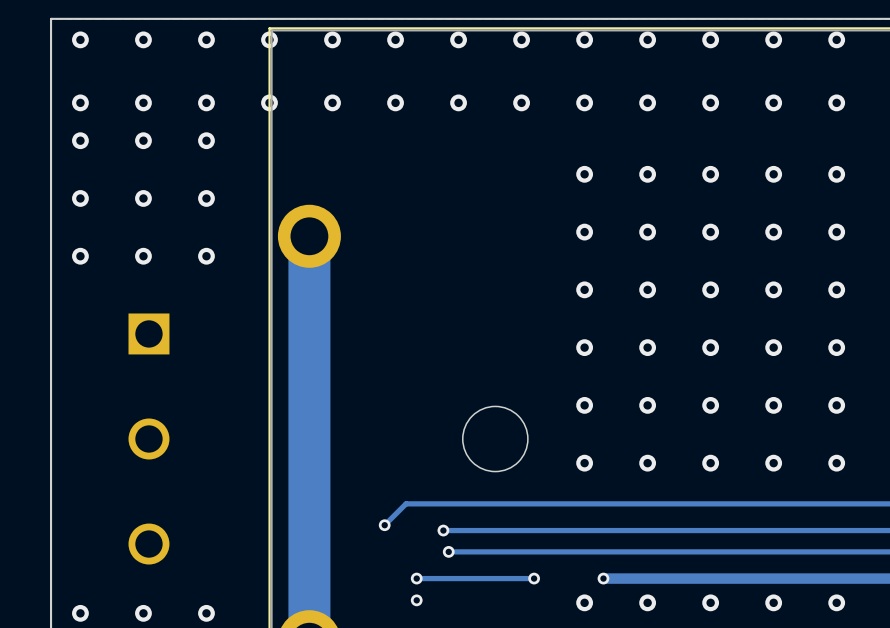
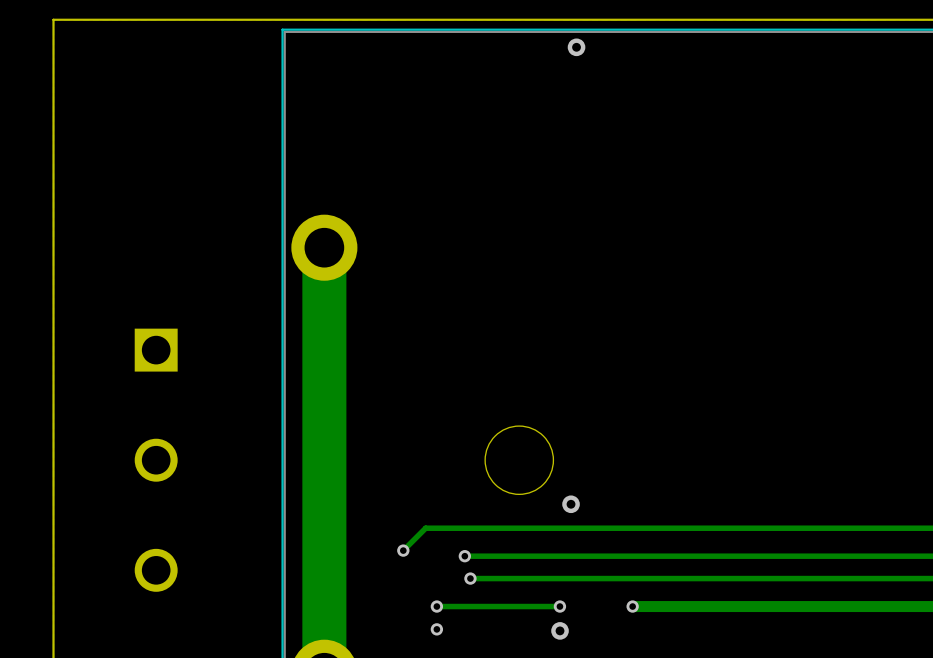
via: (80, 39) -> none
via: (143, 39) -> none
via: (206, 39) -> none
via: (269, 39) -> none
via: (332, 39) -> none
via: (395, 39) -> none
via: (458, 39) -> none
via: (521, 39) -> none
via: (584, 39) -> none
via: (647, 39) -> none
via: (710, 39) -> none
via: (773, 39) -> none
via: (836, 39) -> none
via: none -> (576, 47)
via: (80, 102) -> none
via: (143, 102) -> none
via: (206, 102) -> none
via: (269, 102) -> none
via: (332, 102) -> none
via: (395, 102) -> none
via: (458, 102) -> none
via: (521, 102) -> none
via: (584, 102) -> none
via: (647, 102) -> none
via: (710, 102) -> none
via: (773, 102) -> none
via: (836, 102) -> none
via: (80, 140) -> none
via: (143, 140) -> none
via: (206, 140) -> none
via: (584, 174) -> none
via: (647, 174) -> none
via: (710, 174) -> none
via: (773, 174) -> none
via: (836, 174) -> none
via: (80, 198) -> none
via: (143, 198) -> none
via: (206, 198) -> none
via: (584, 232) -> none
via: (647, 232) -> none
via: (710, 232) -> none
via: (773, 232) -> none
via: (836, 232) -> none
via: (80, 256) -> none
via: (143, 256) -> none
via: (206, 256) -> none
via: (584, 289) -> none
via: (647, 289) -> none
via: (710, 289) -> none
via: (773, 289) -> none
via: (836, 289) -> none
via: (584, 347) -> none
via: (647, 347) -> none
via: (710, 347) -> none
via: (773, 347) -> none
via: (836, 347) -> none
via: (584, 405) -> none
via: (647, 405) -> none
via: (710, 405) -> none
via: (773, 405) -> none
via: (836, 405) -> none
via: (584, 463) -> none
via: (647, 463) -> none
via: (710, 463) -> none
via: (773, 463) -> none
via: (836, 463) -> none
via: none -> (571, 504)
via position: (584, 602) -> (560, 630)
via: (647, 602) -> none
via: (710, 602) -> none
via: (773, 602) -> none
via: (836, 602) -> none
via: (80, 613) -> none
via: (143, 613) -> none
via: (206, 613) -> none

